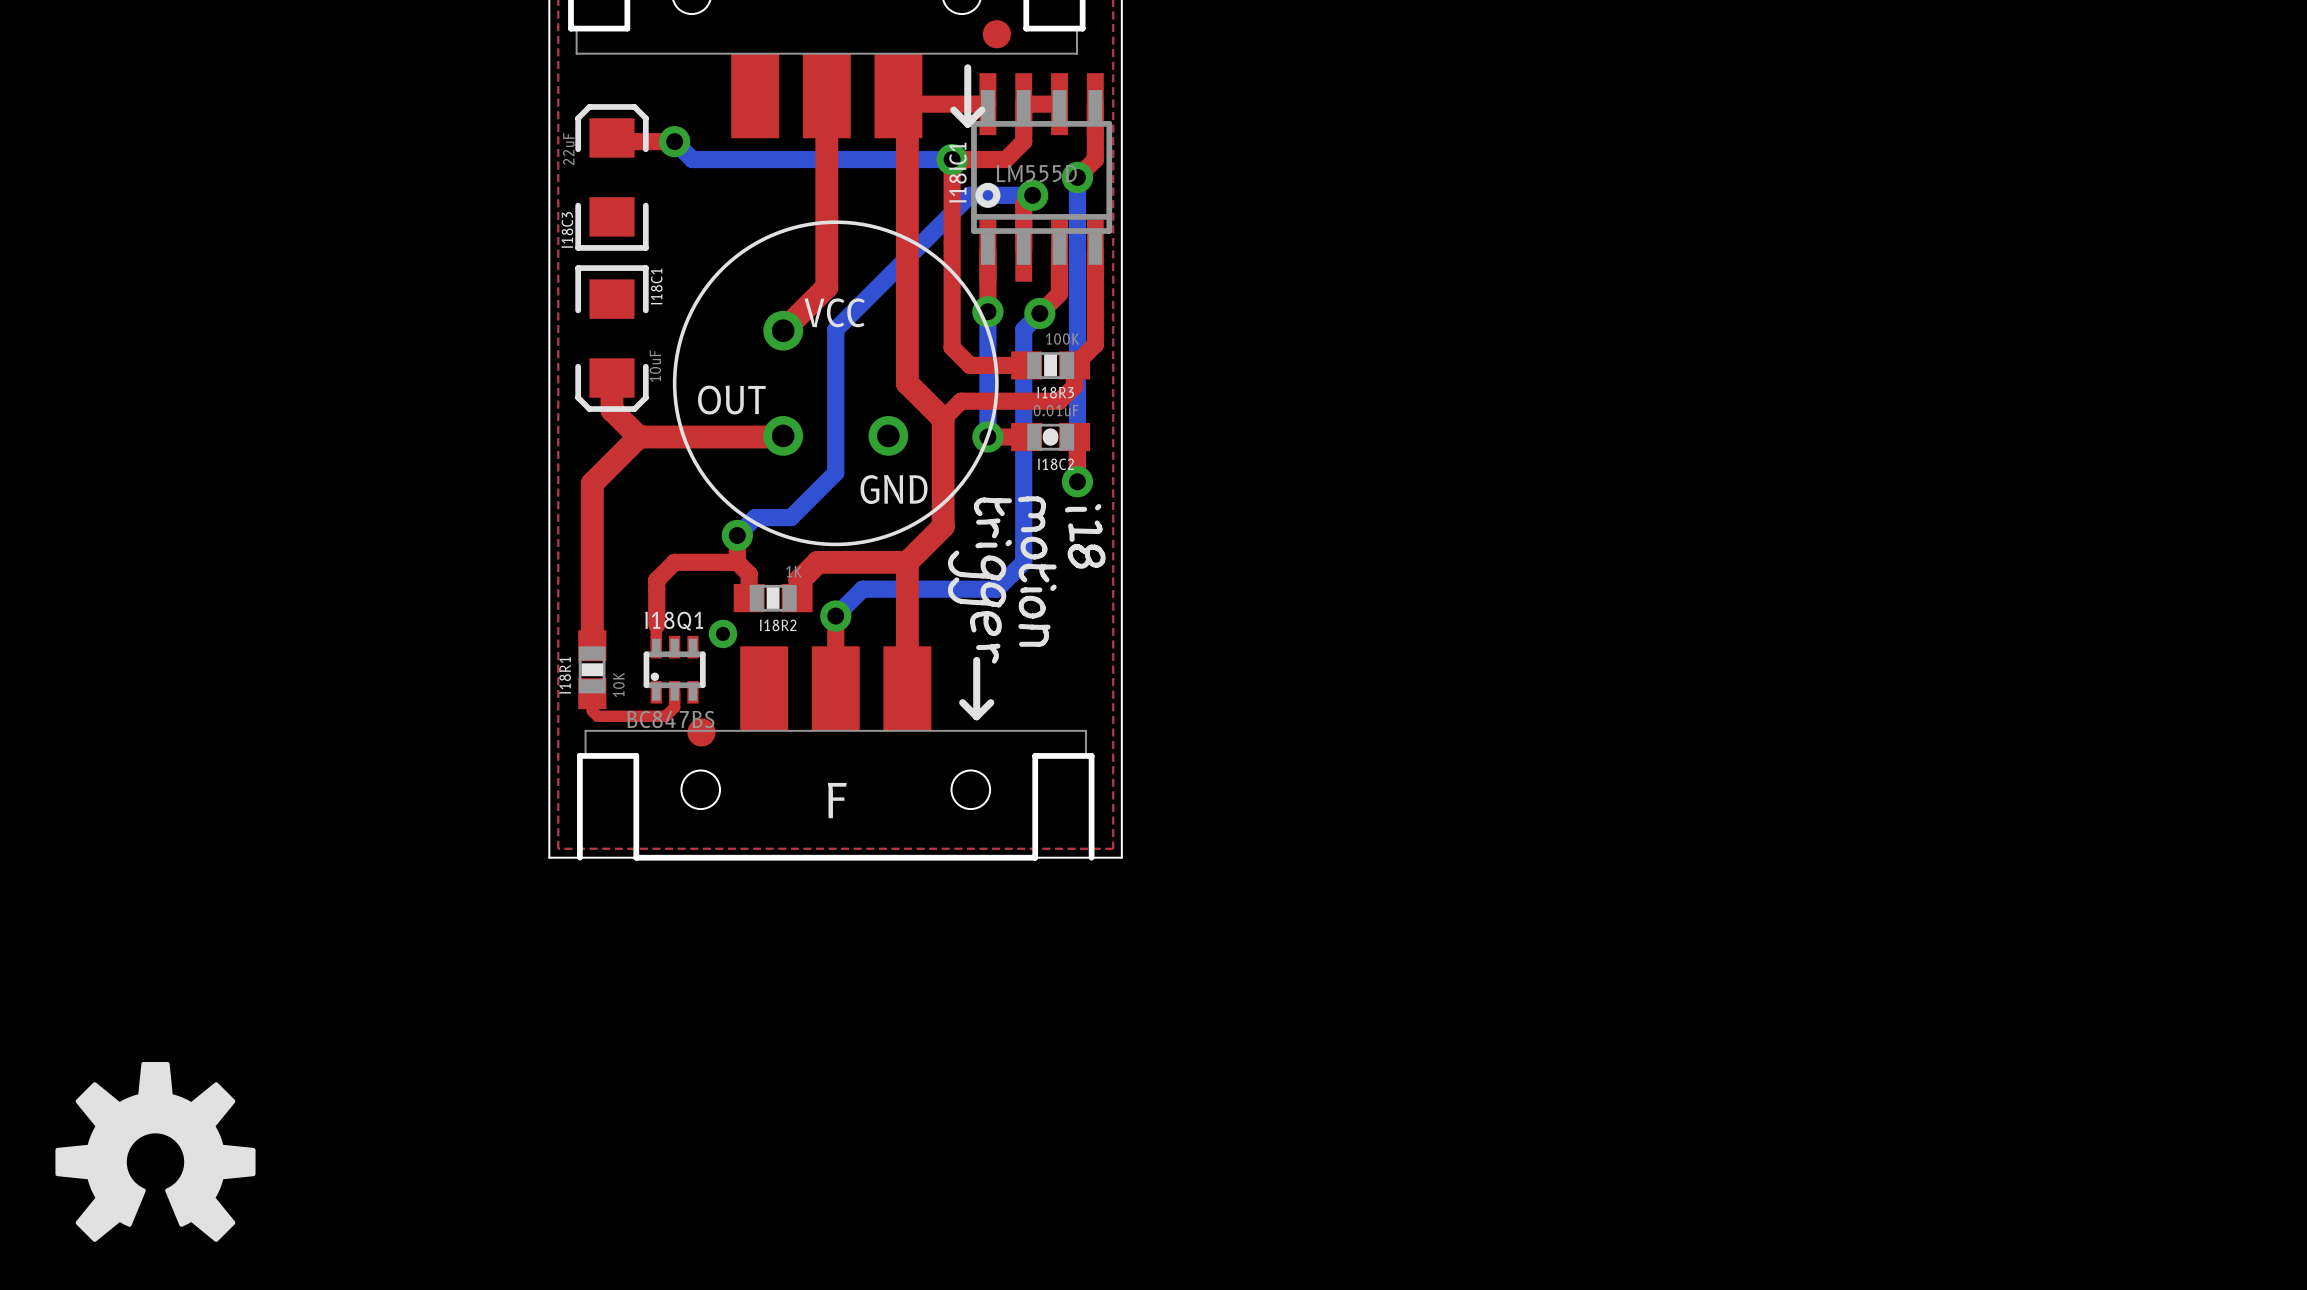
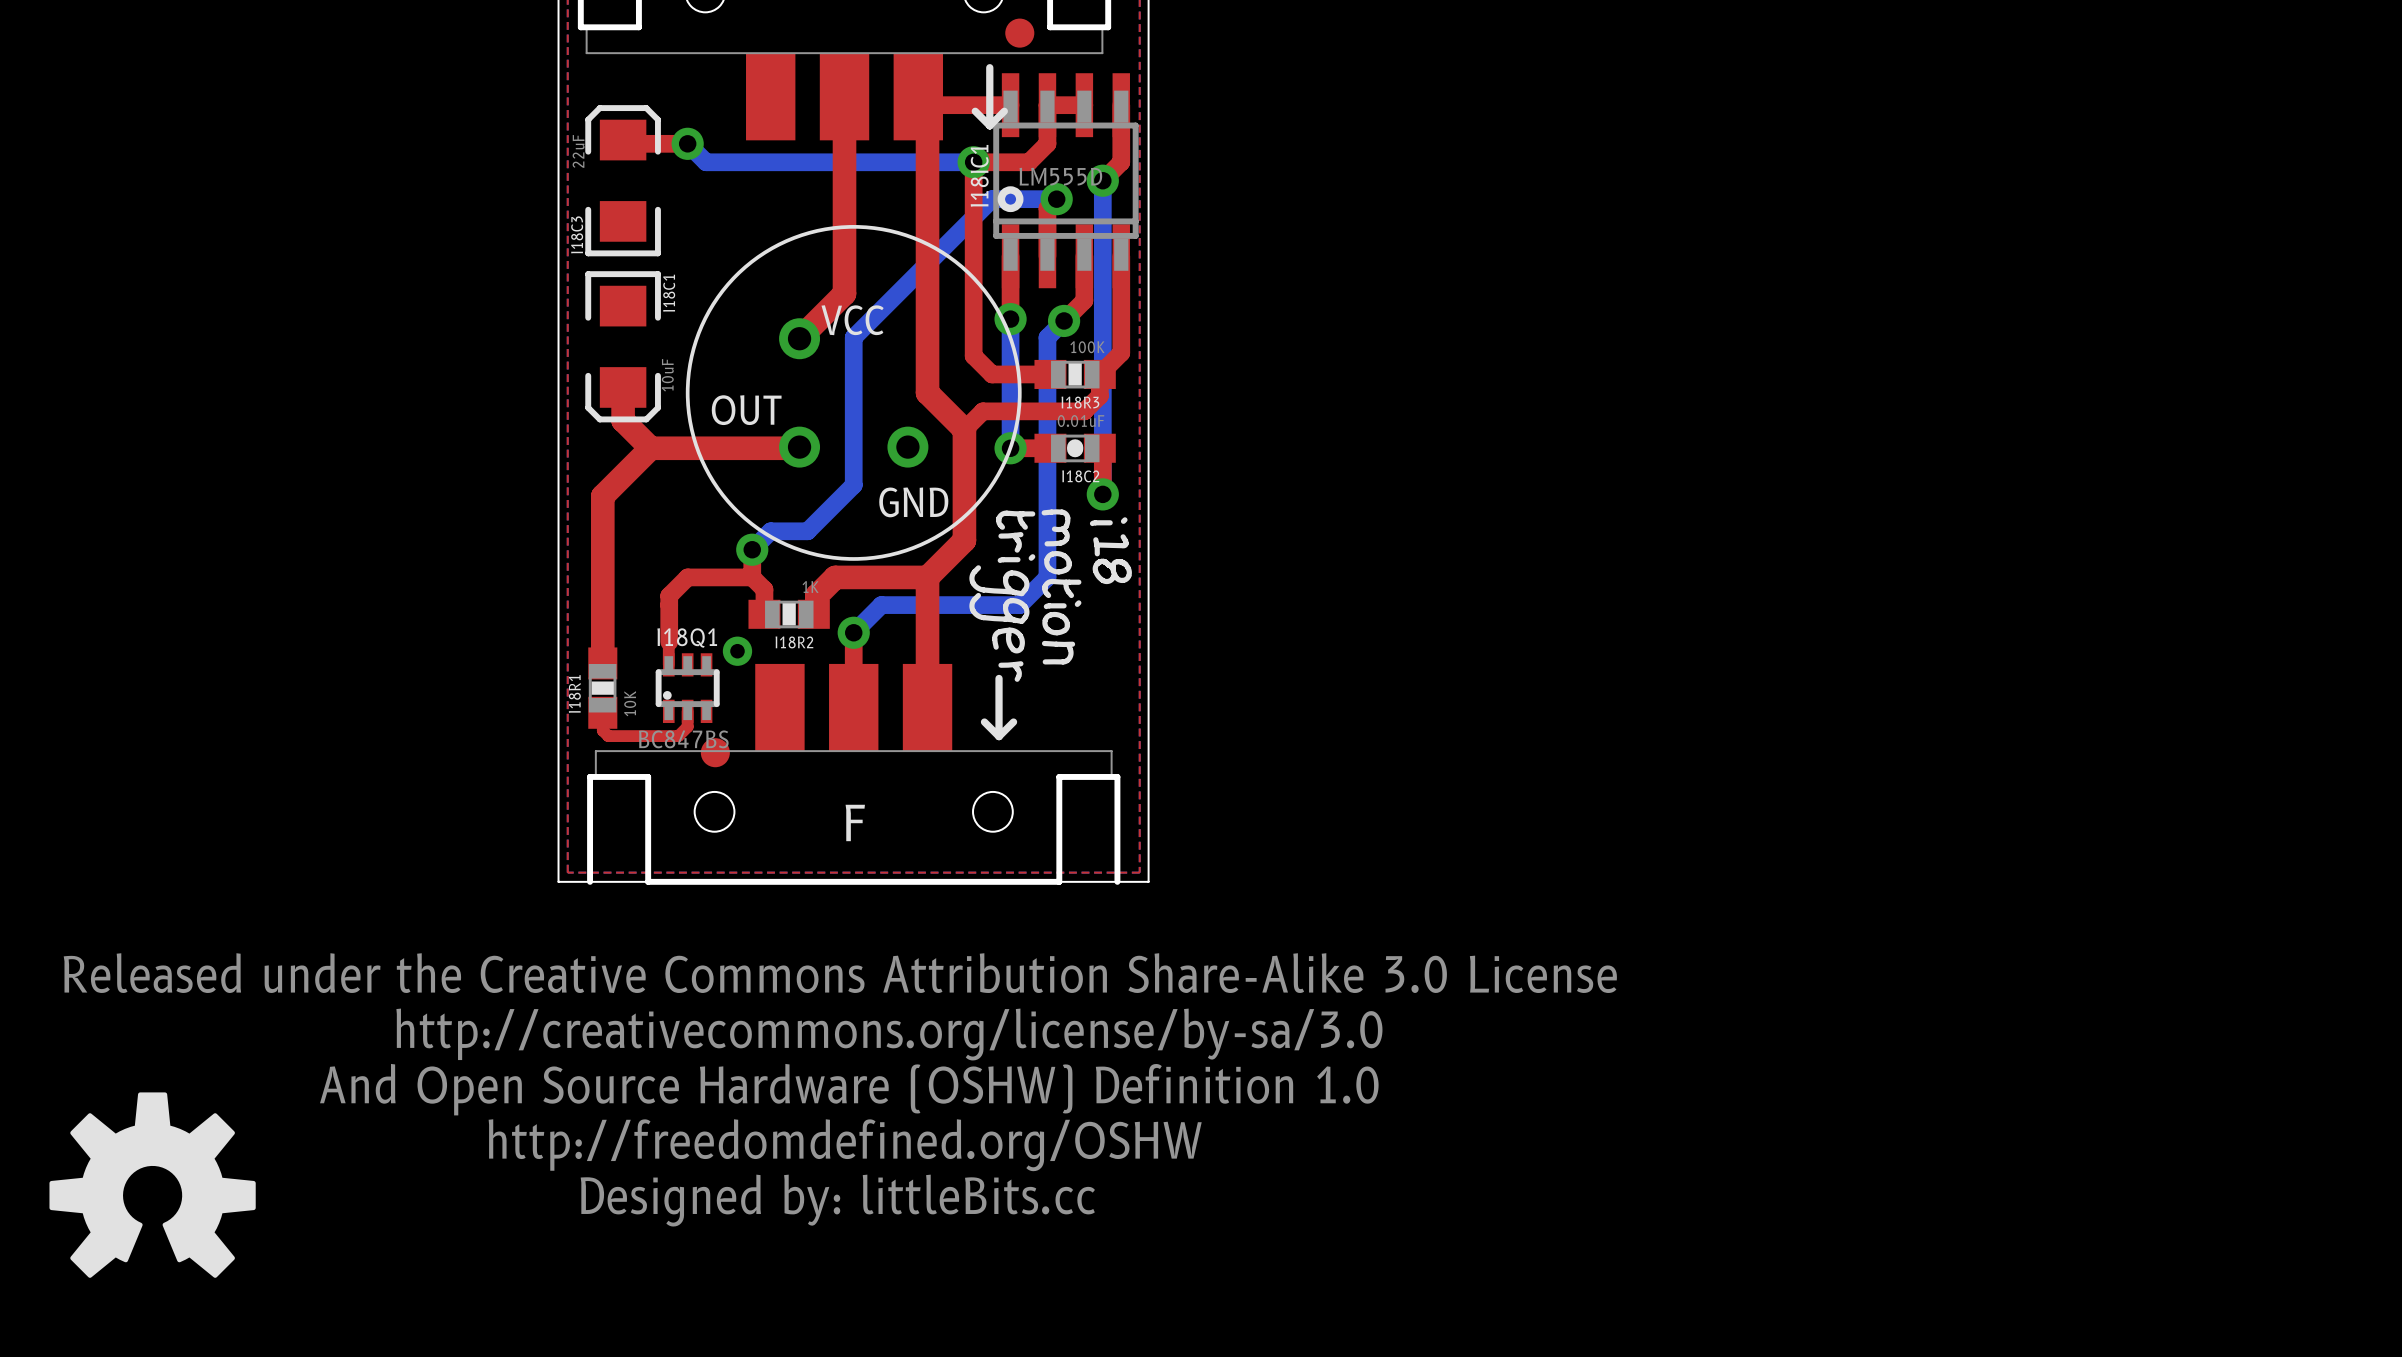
drawing: none -> [63, 953, 1617, 1227]

